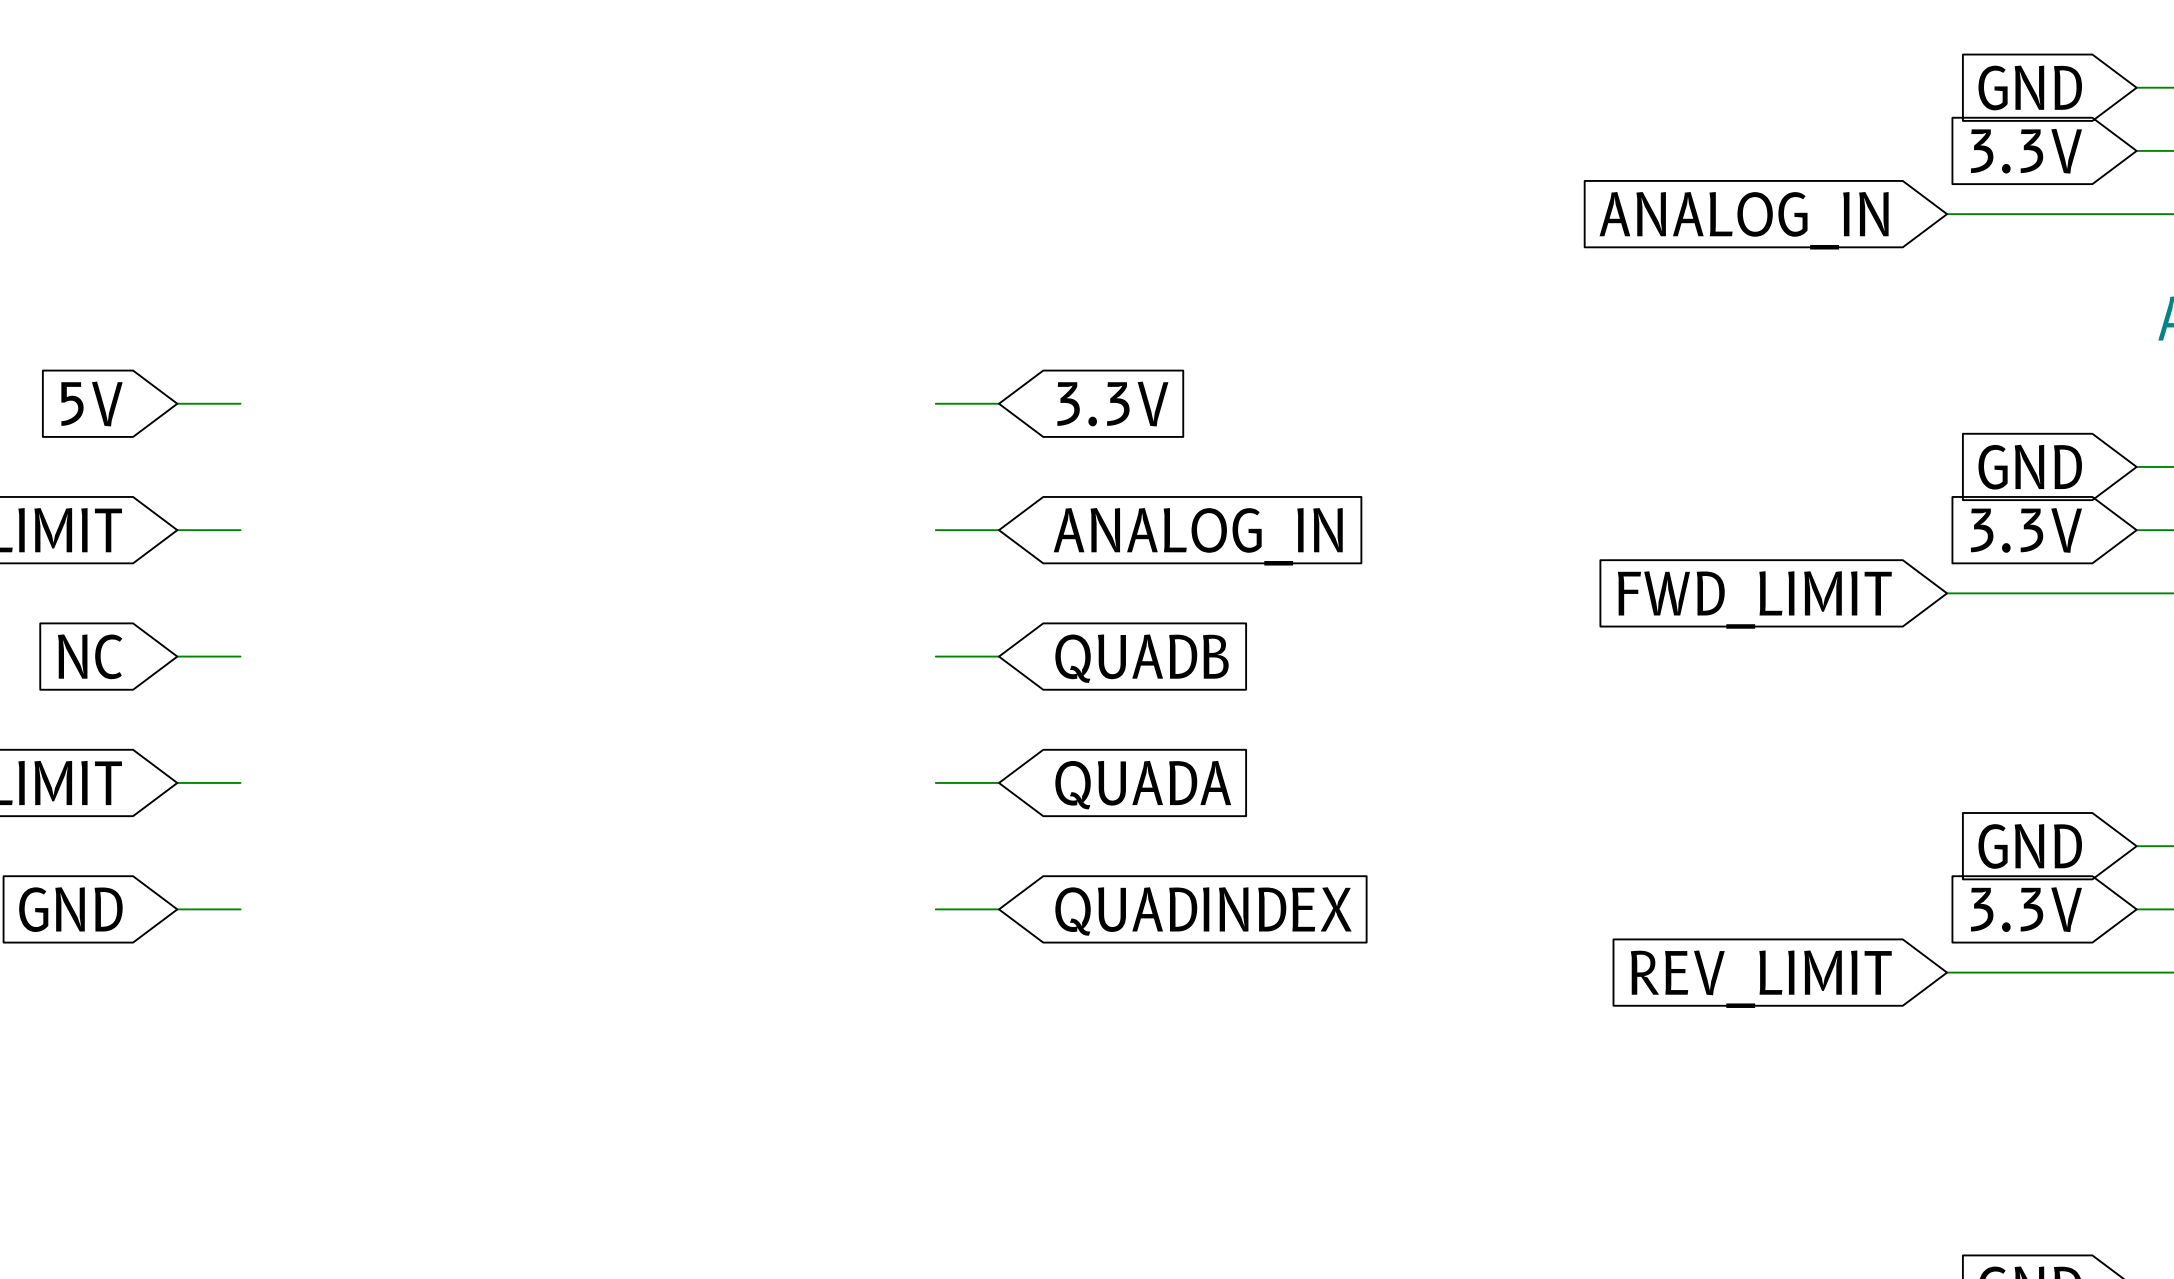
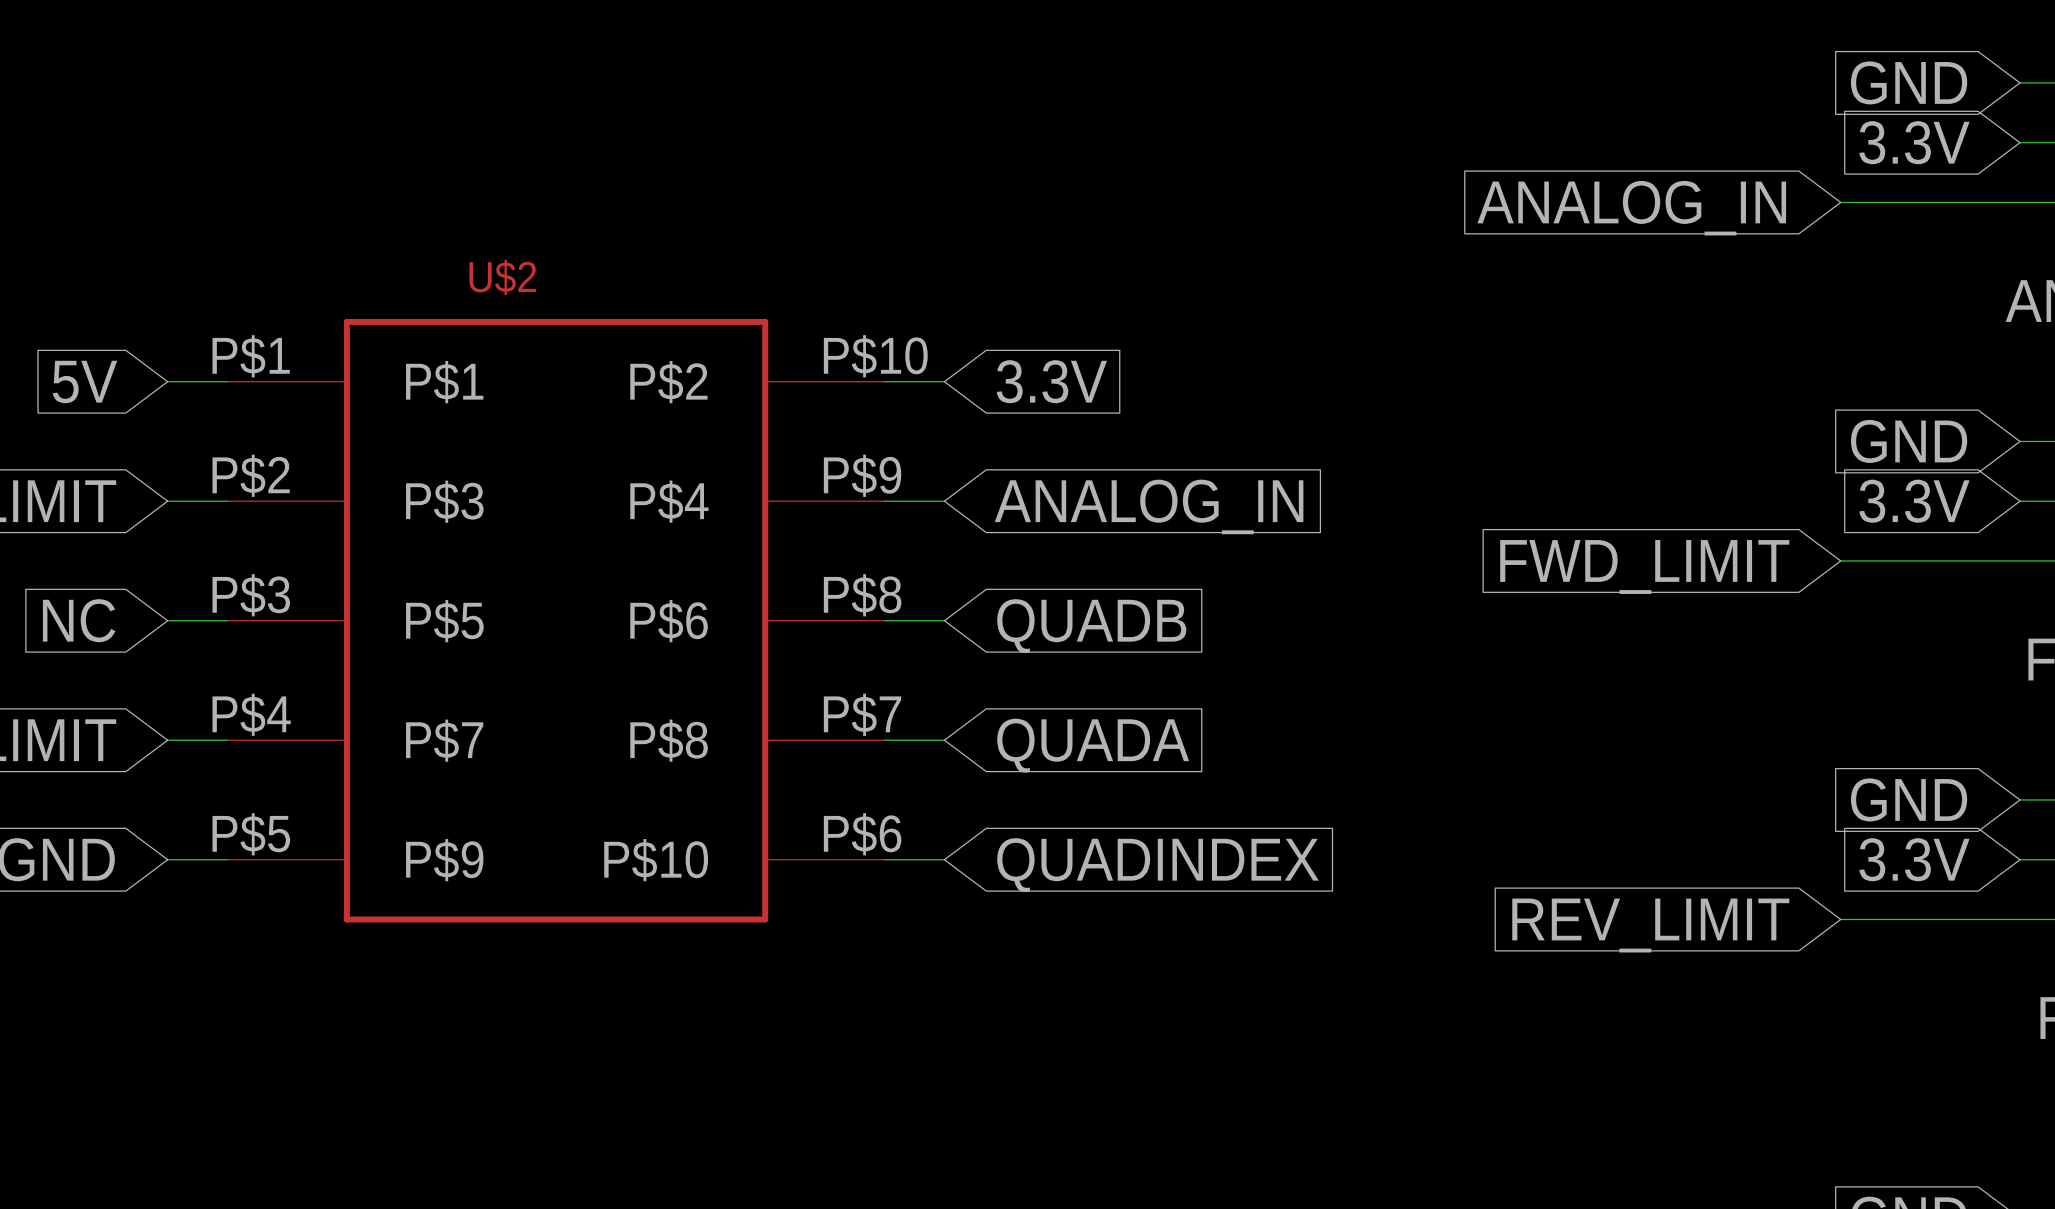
U$2: none -> (556, 620)

